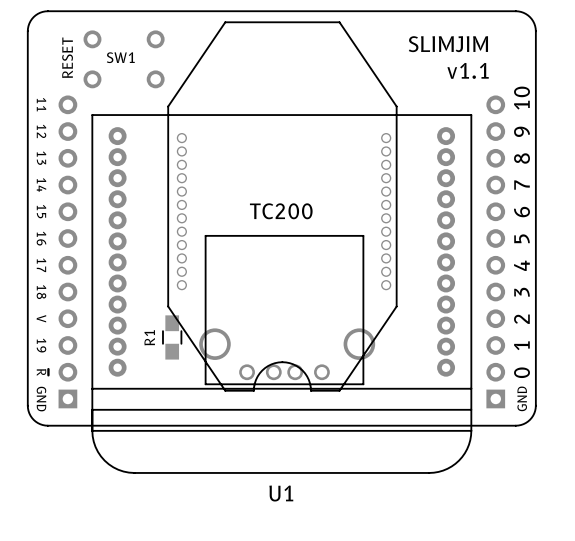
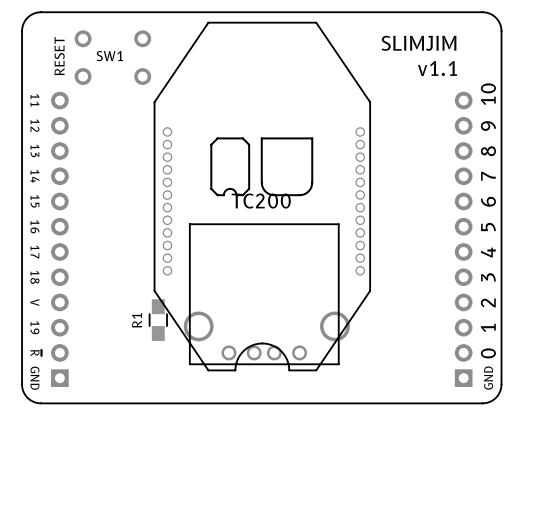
line: none -> (217, 138) (242, 138) (249, 144) (249, 188) (242, 195) (236, 195) (234, 190) (230, 188) (225, 190) (223, 195) (217, 195) (211, 188) (211, 144) (217, 138)
line: none -> (261, 138) (261, 182) (264, 190) (274, 195) (301, 195) (307, 192) (312, 184) (312, 138) (261, 138)
U1: (281, 294) -> none

